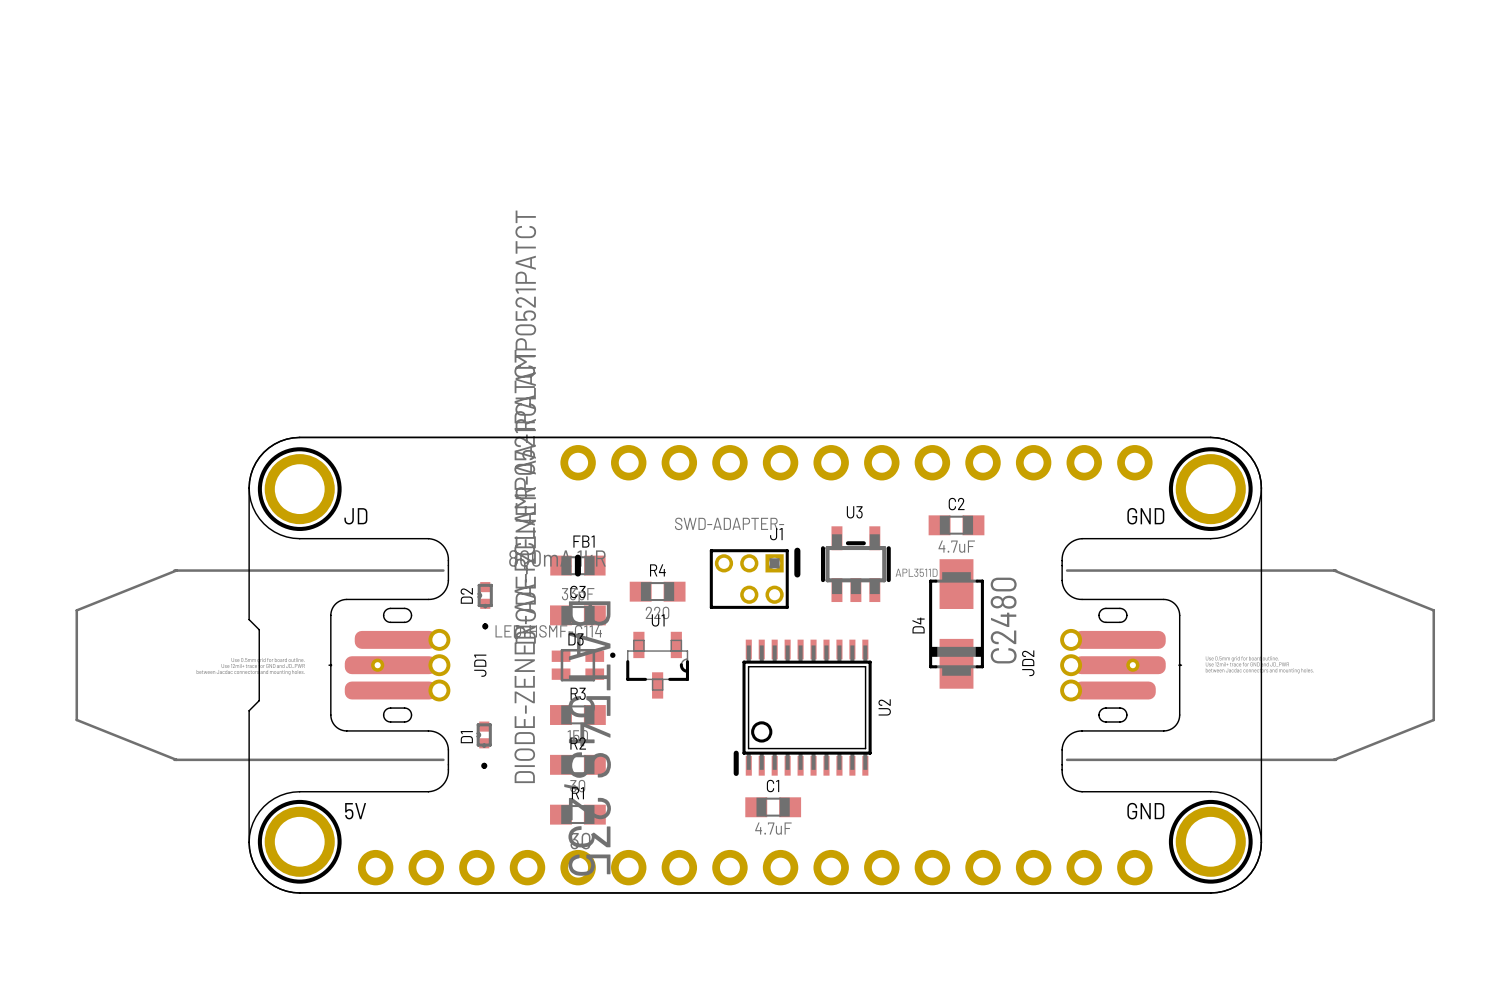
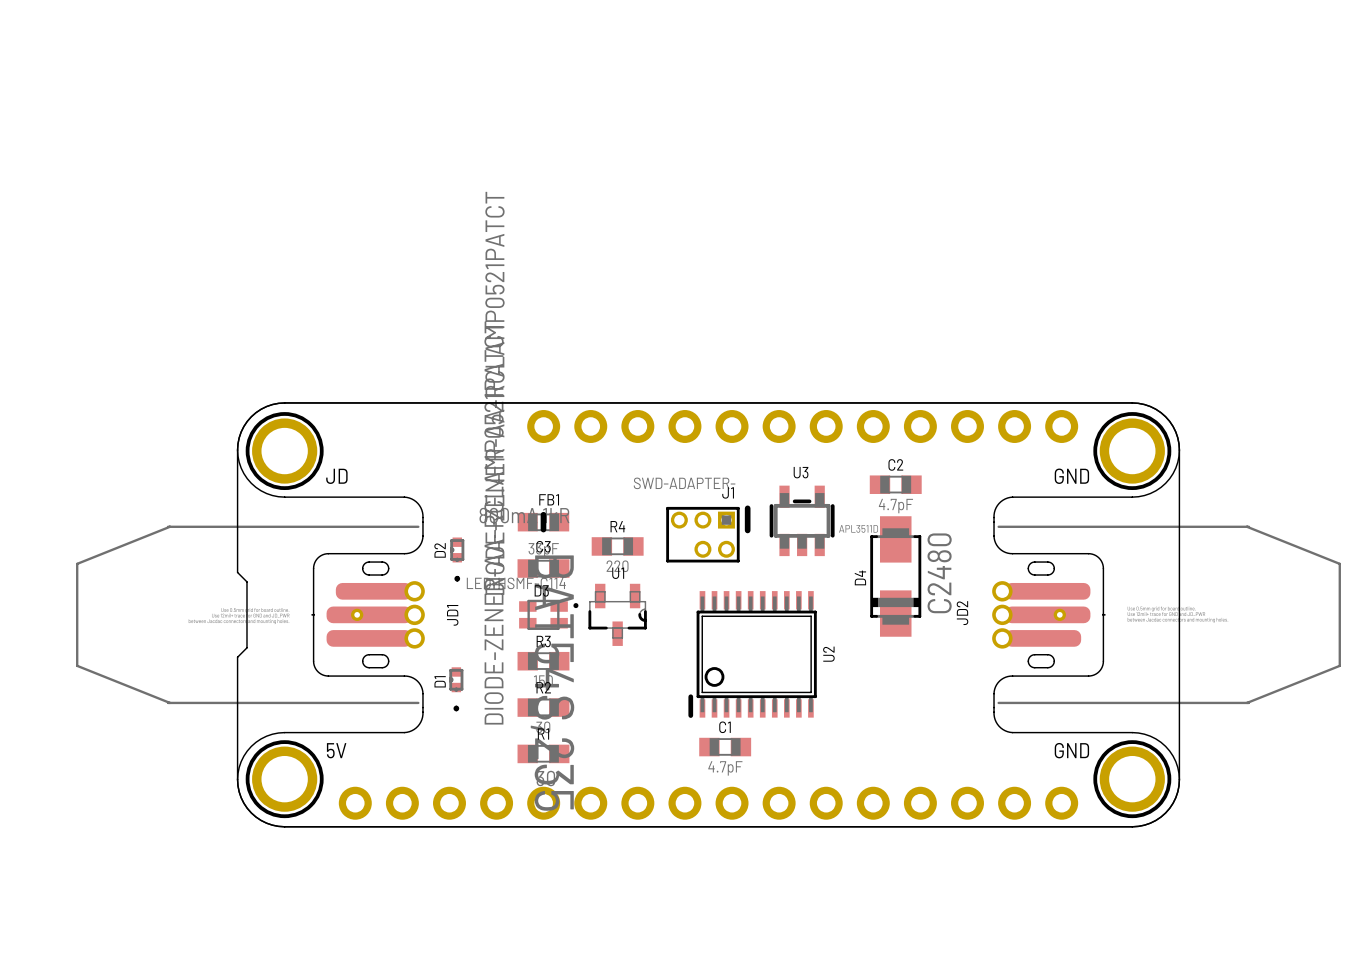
C2 value: 4.7uF (956, 546) -> 4.7pF (895, 506)
C1 value: 4.7uF (773, 828) -> 4.7pF (725, 768)

